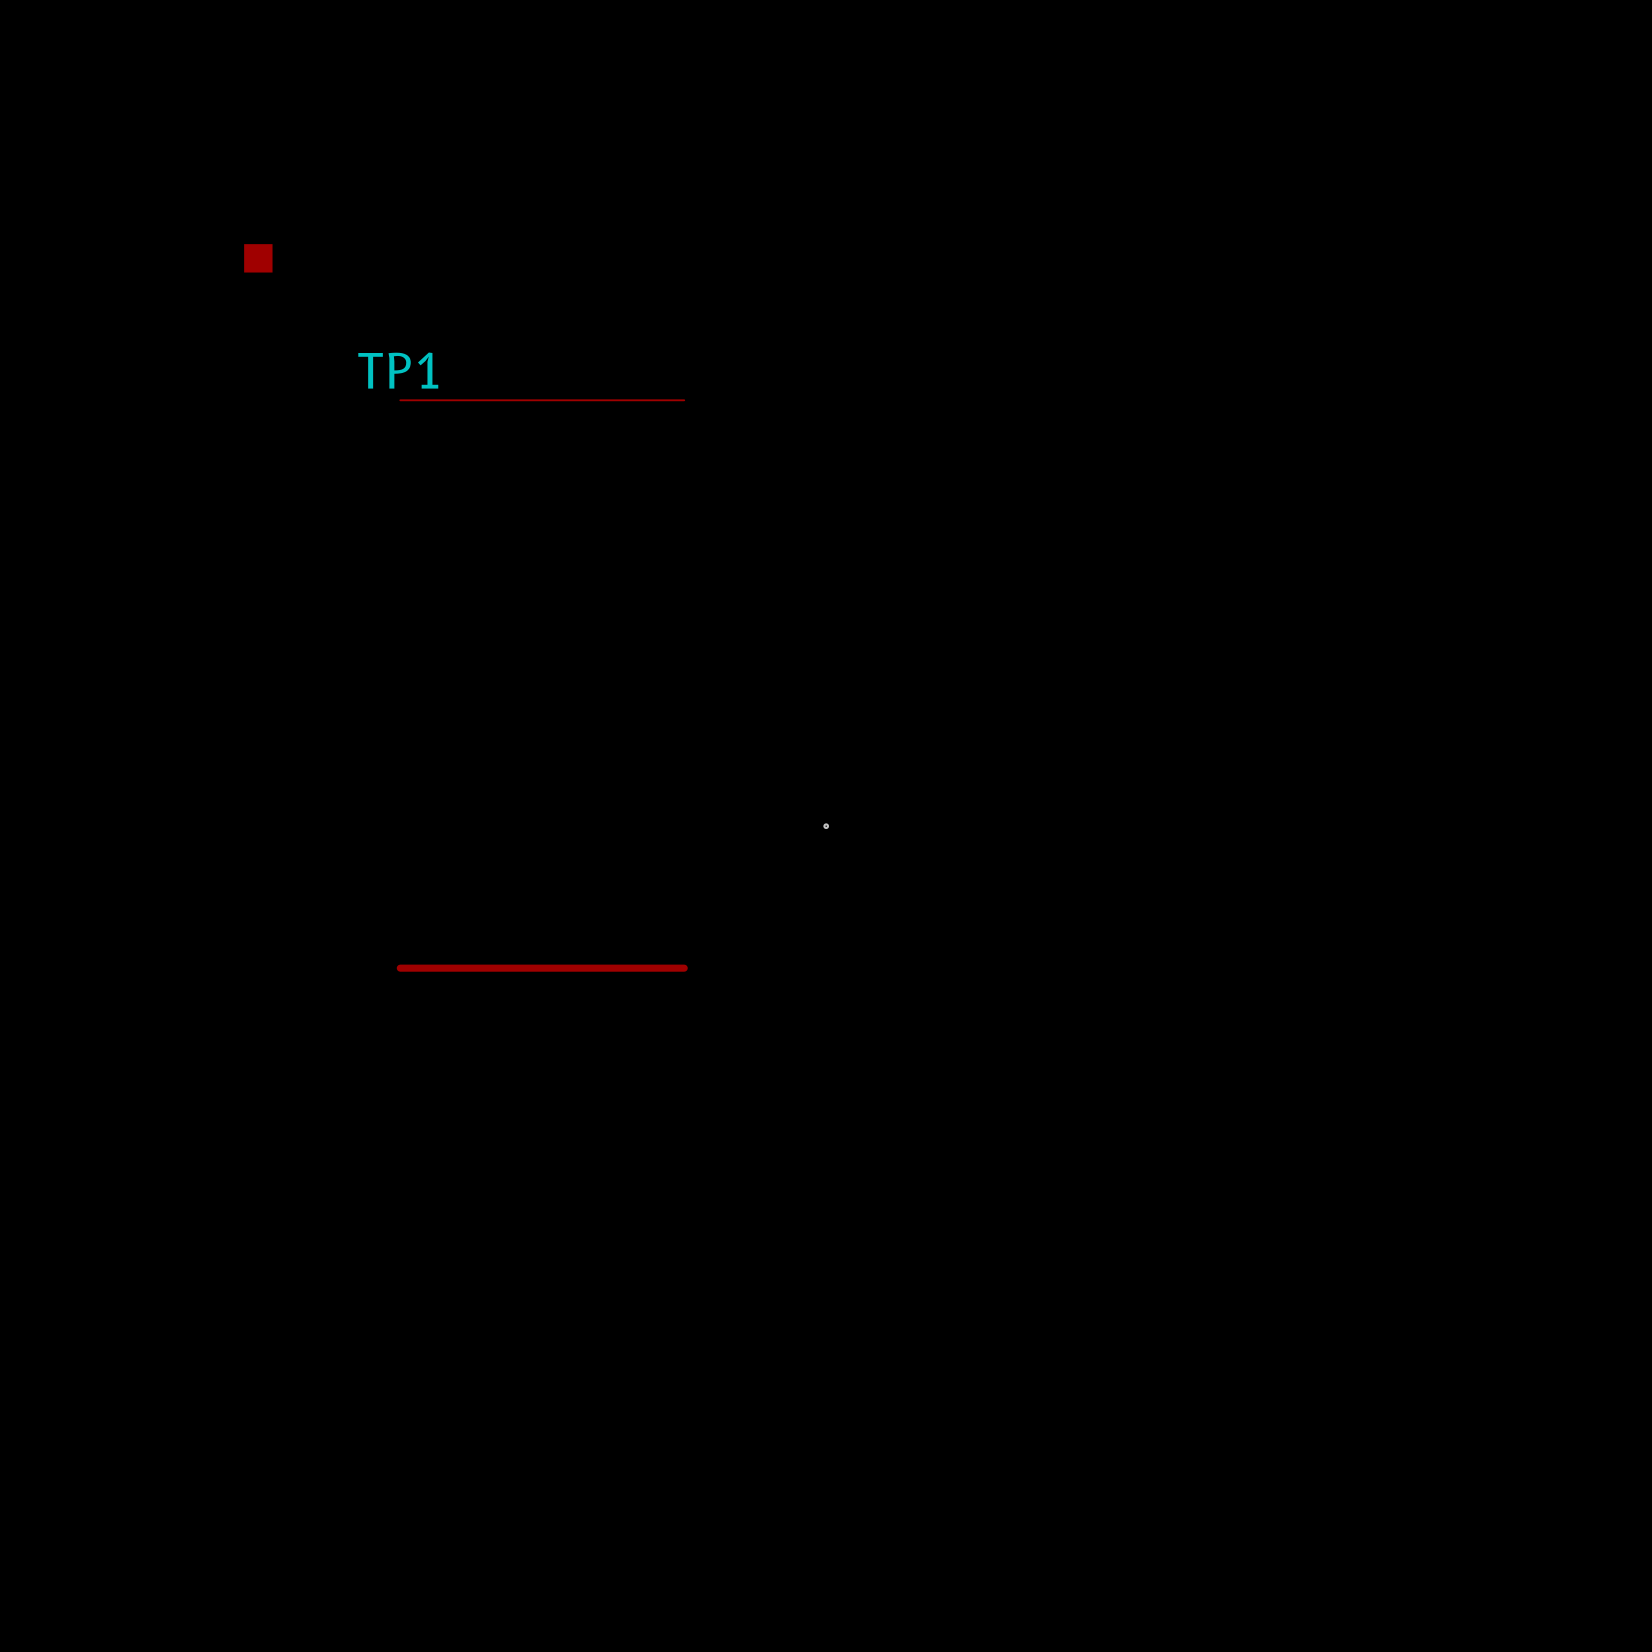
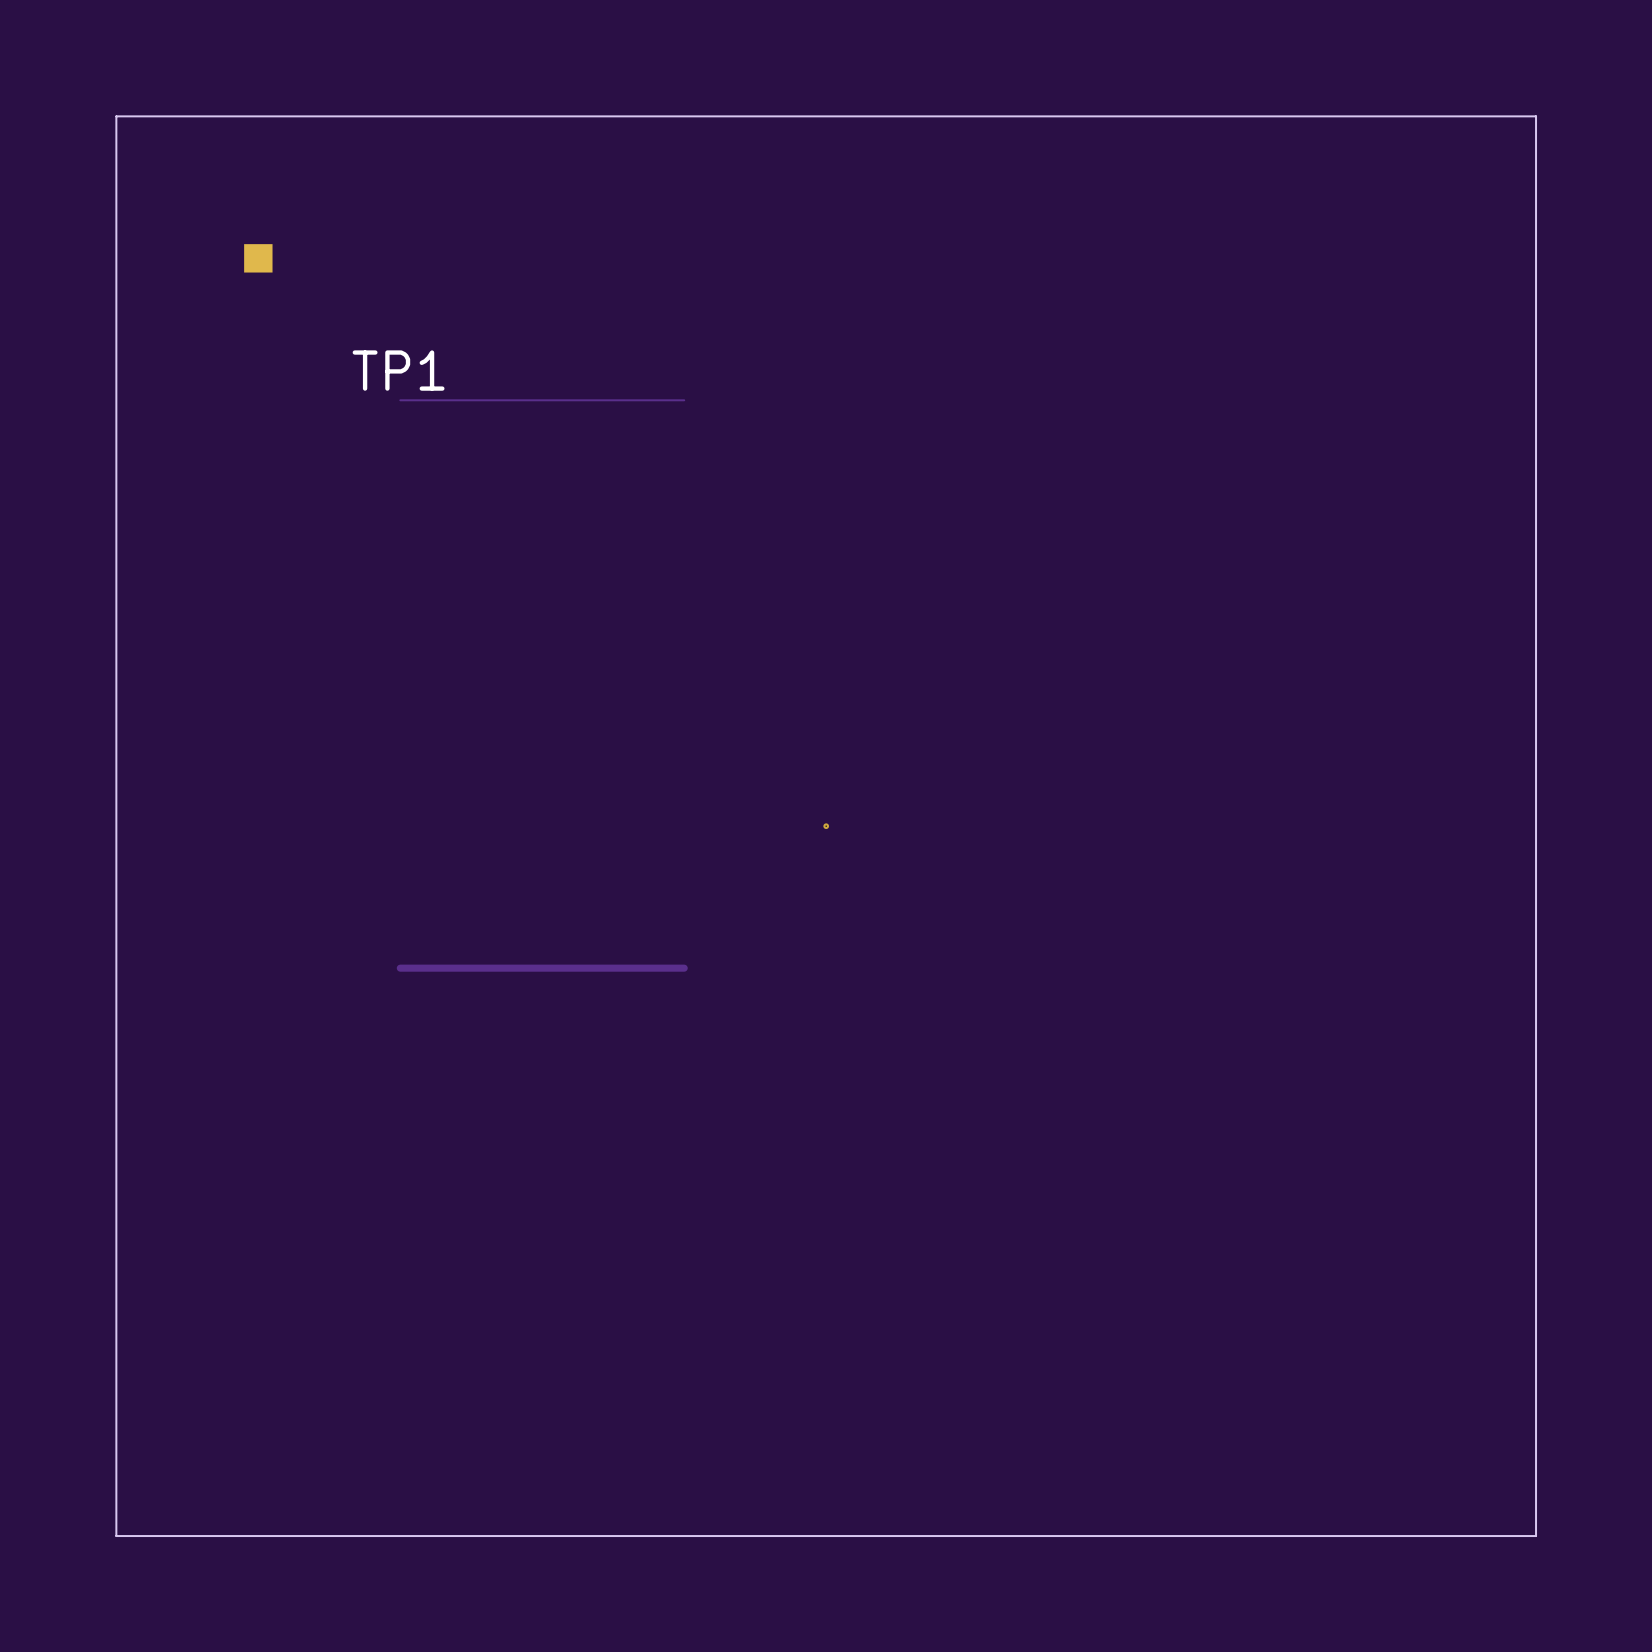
board edge: none -> (116, 116) (1536, 116) (1536, 1536) (116, 1536) (116, 116)

